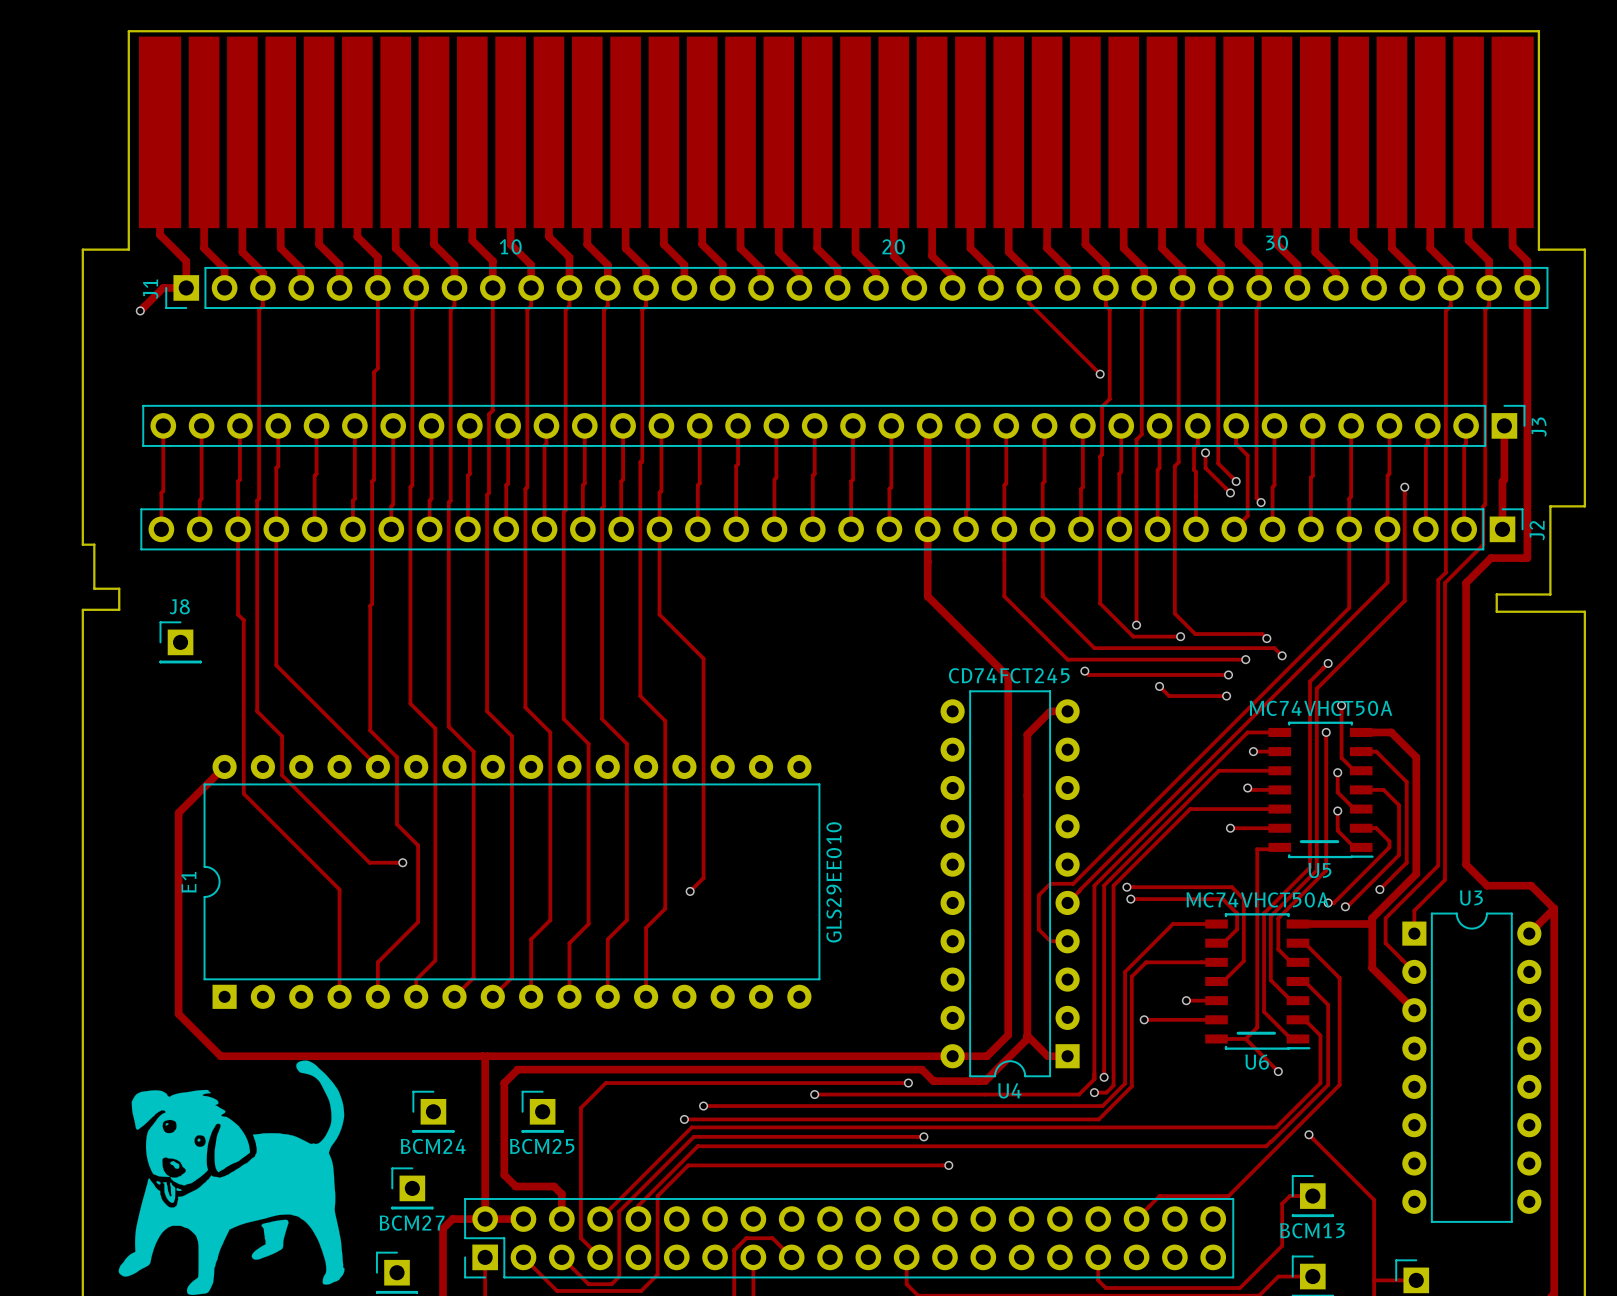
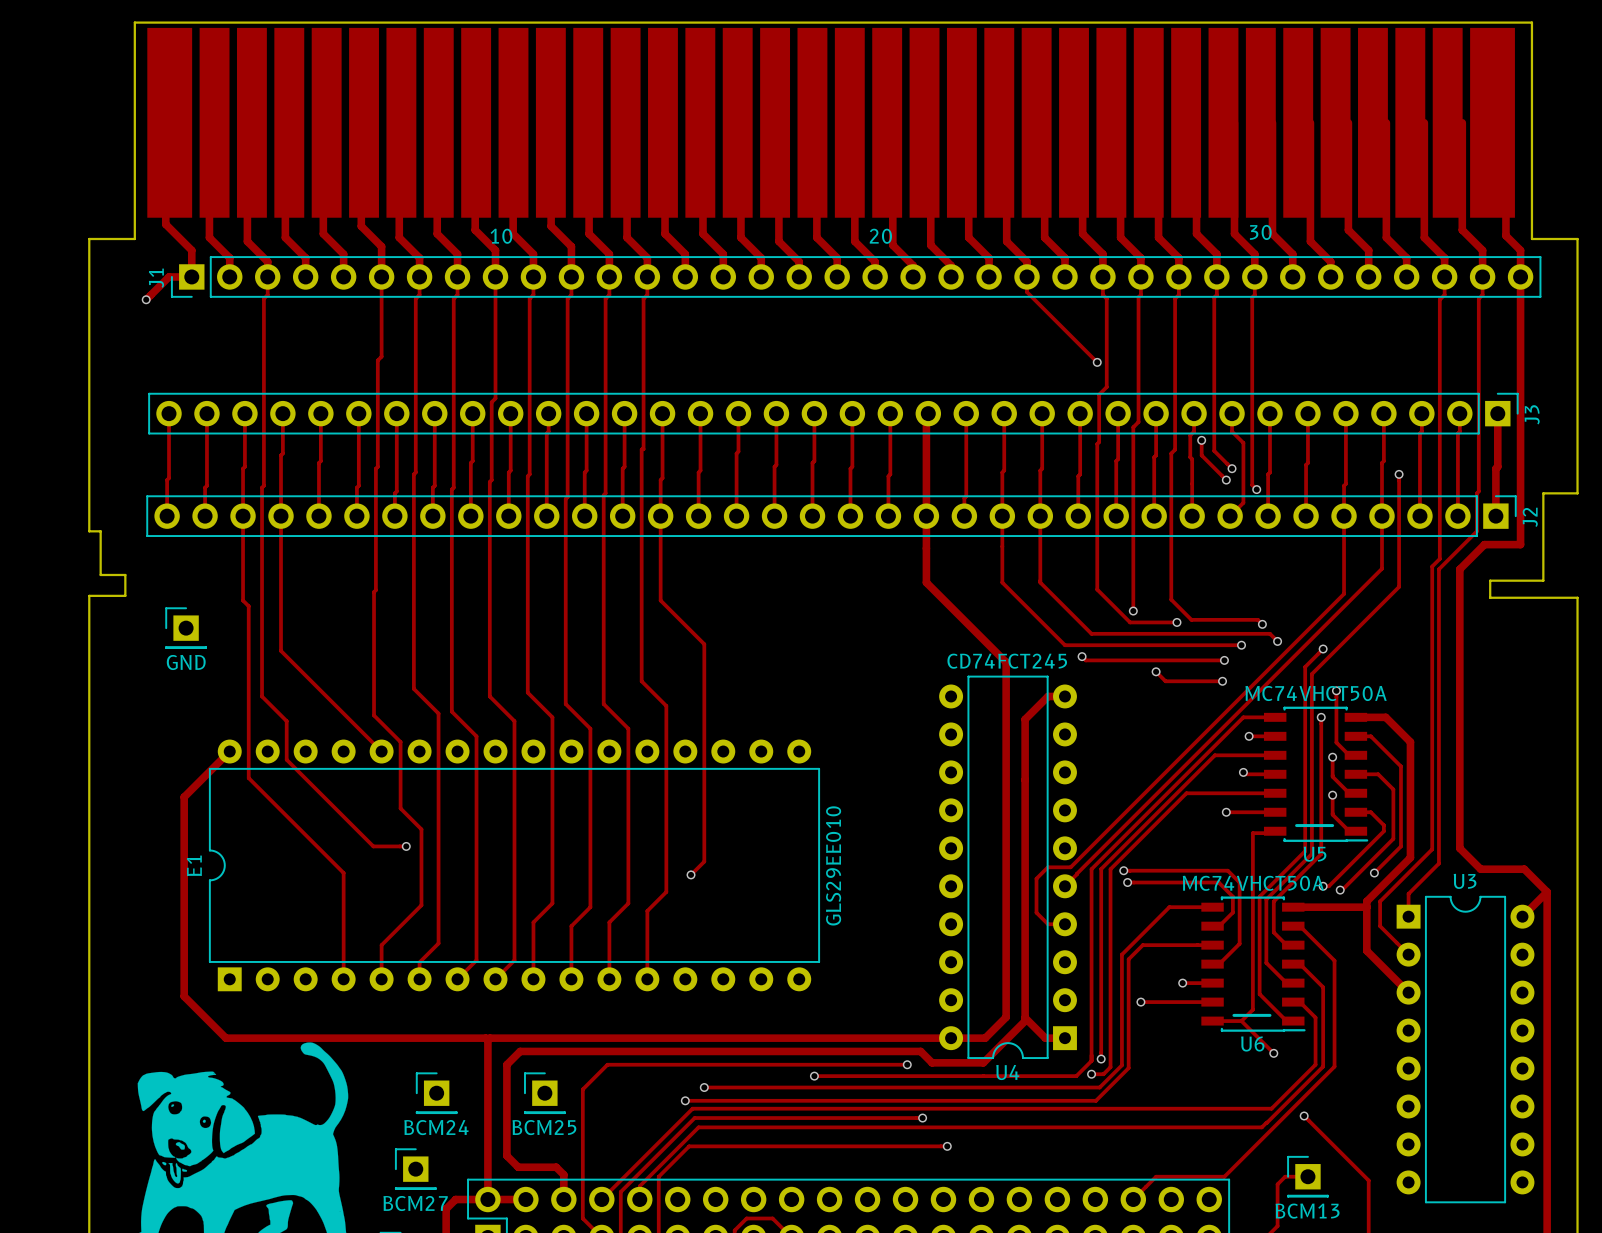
part footprint: [138, 36, 1534, 229] -> [147, 27, 1515, 218]
J8 name: J8 (179, 606) -> none
J8 value: none -> GND (186, 662)

